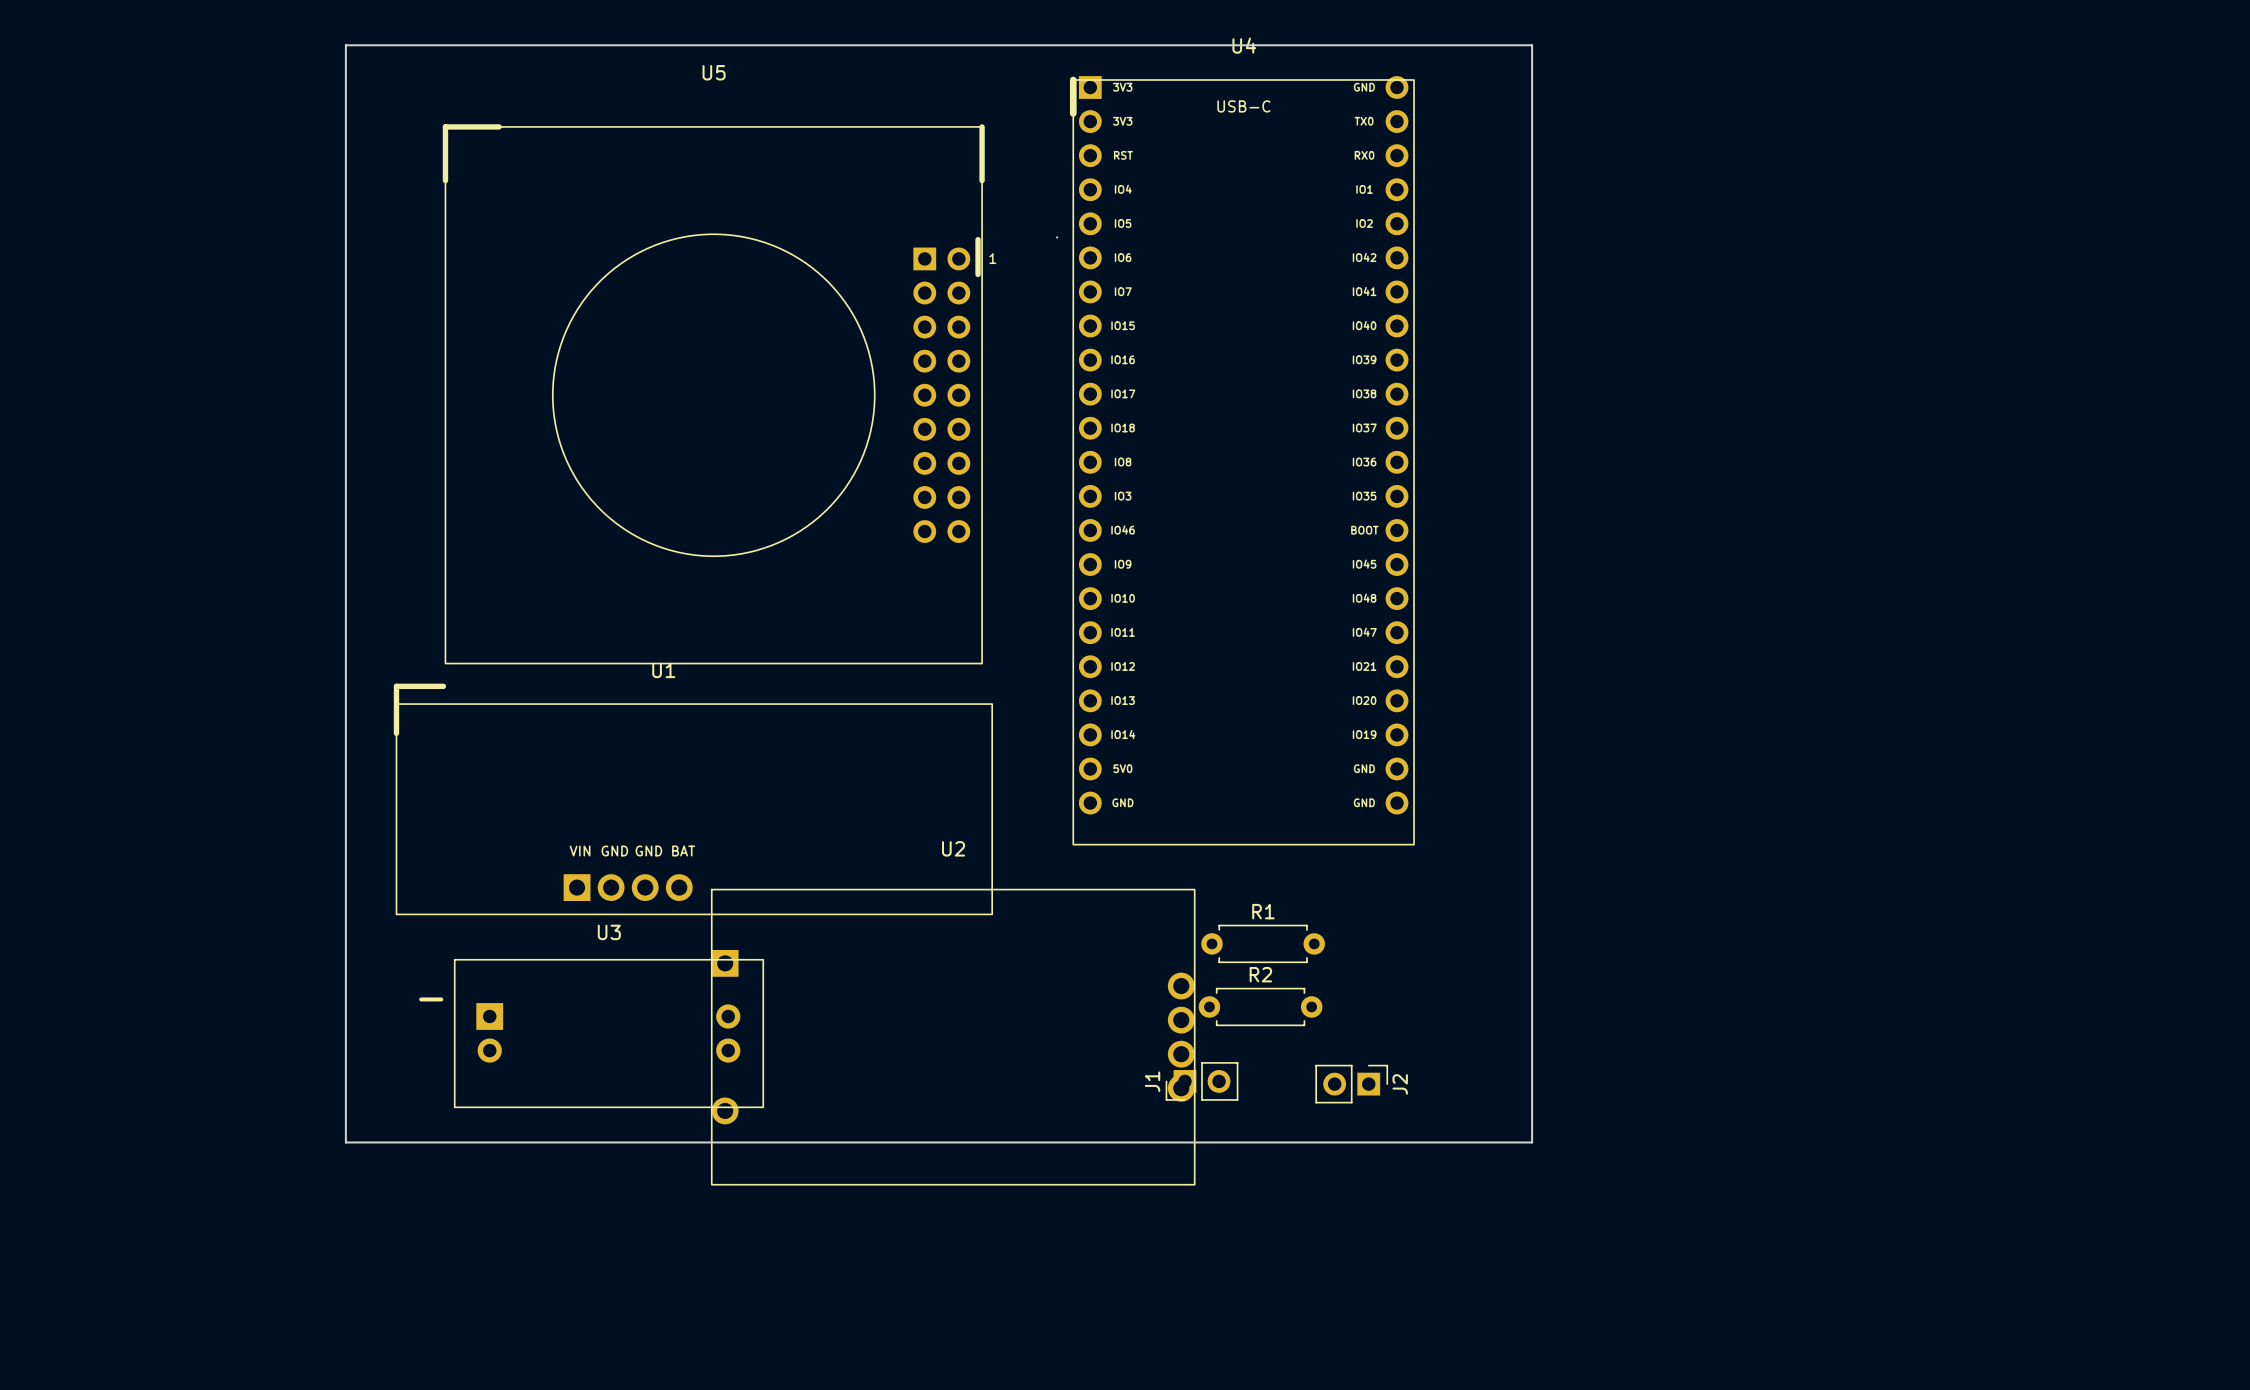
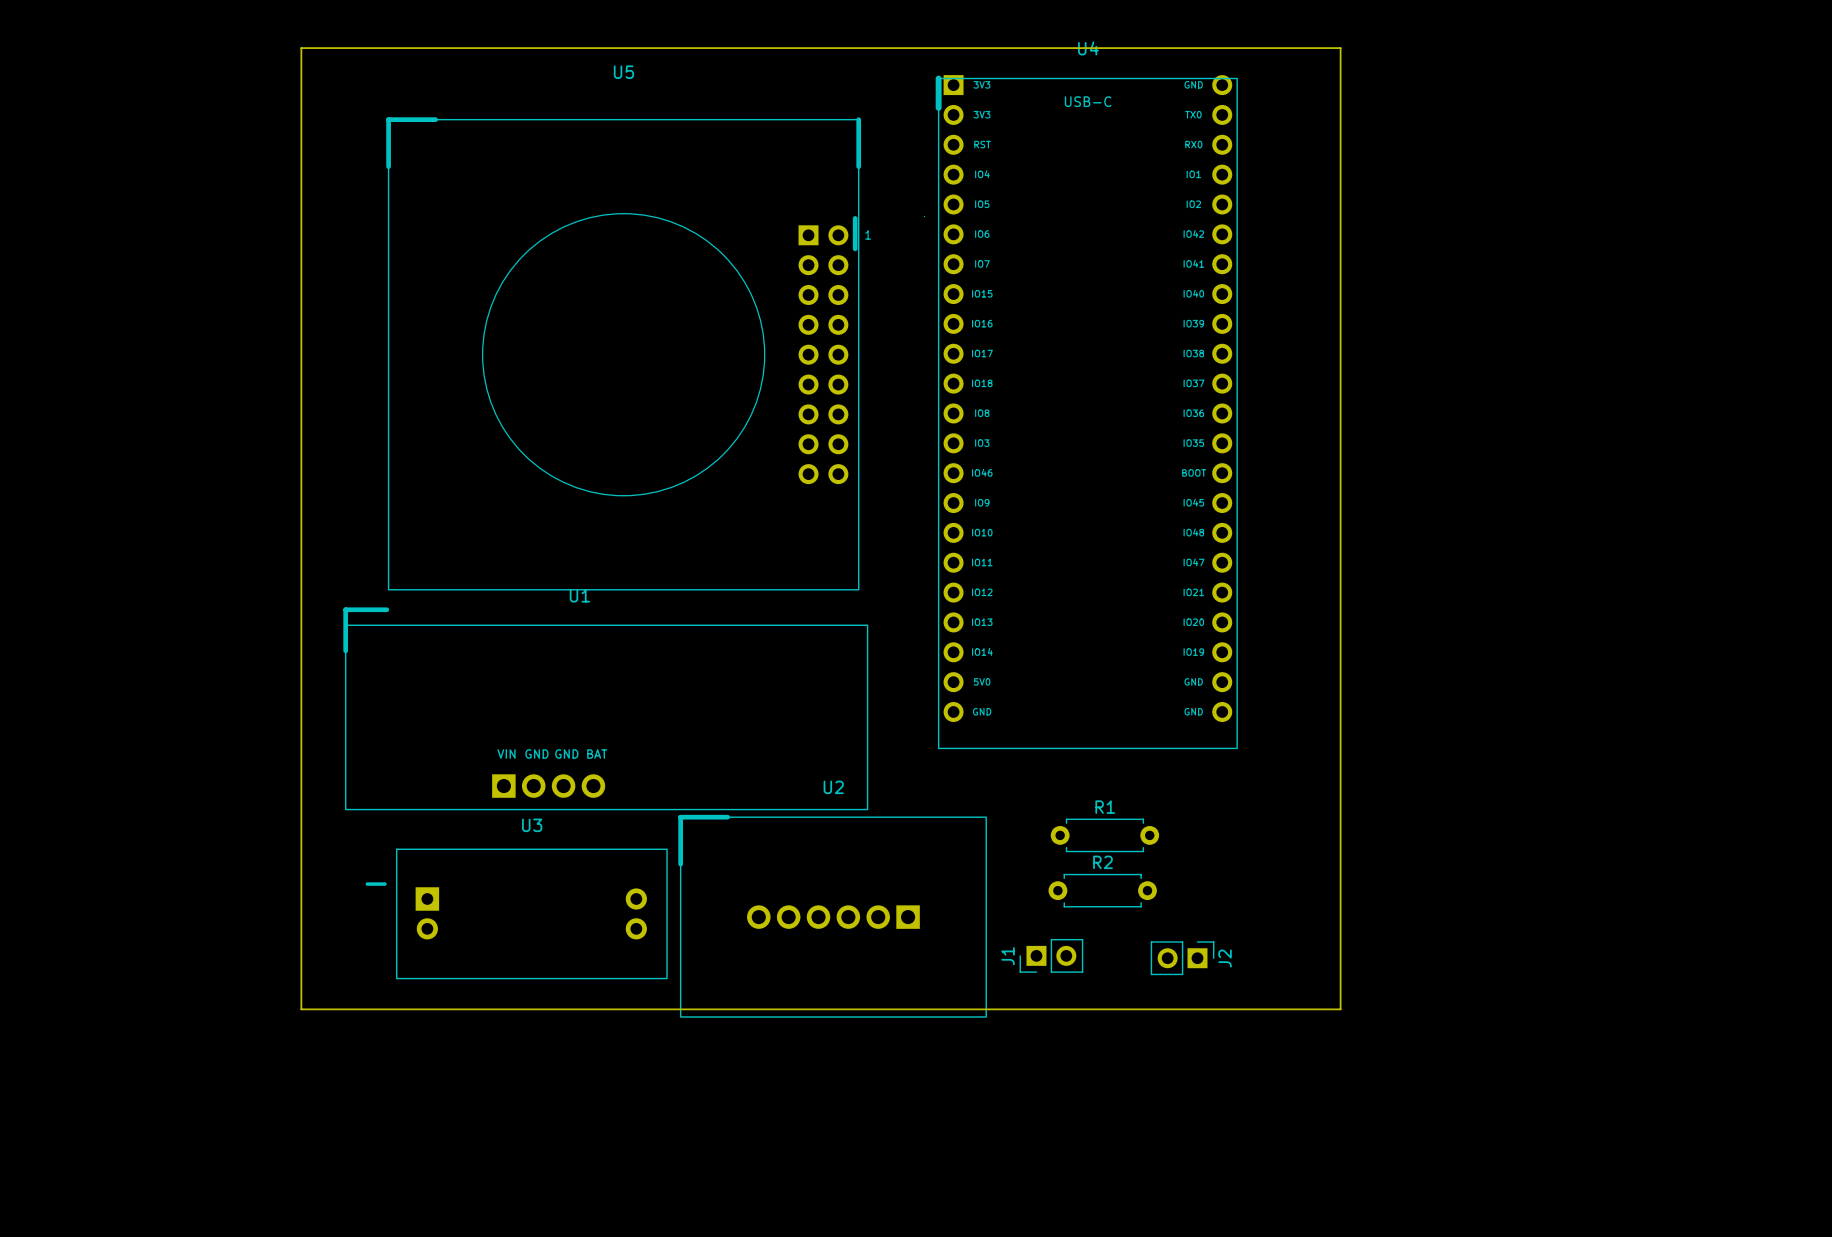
U2 name position: U2 (953, 848) -> U2 (833, 787)
U2 footprint: [710, 888, 1196, 1186] -> [678, 814, 987, 1018]

